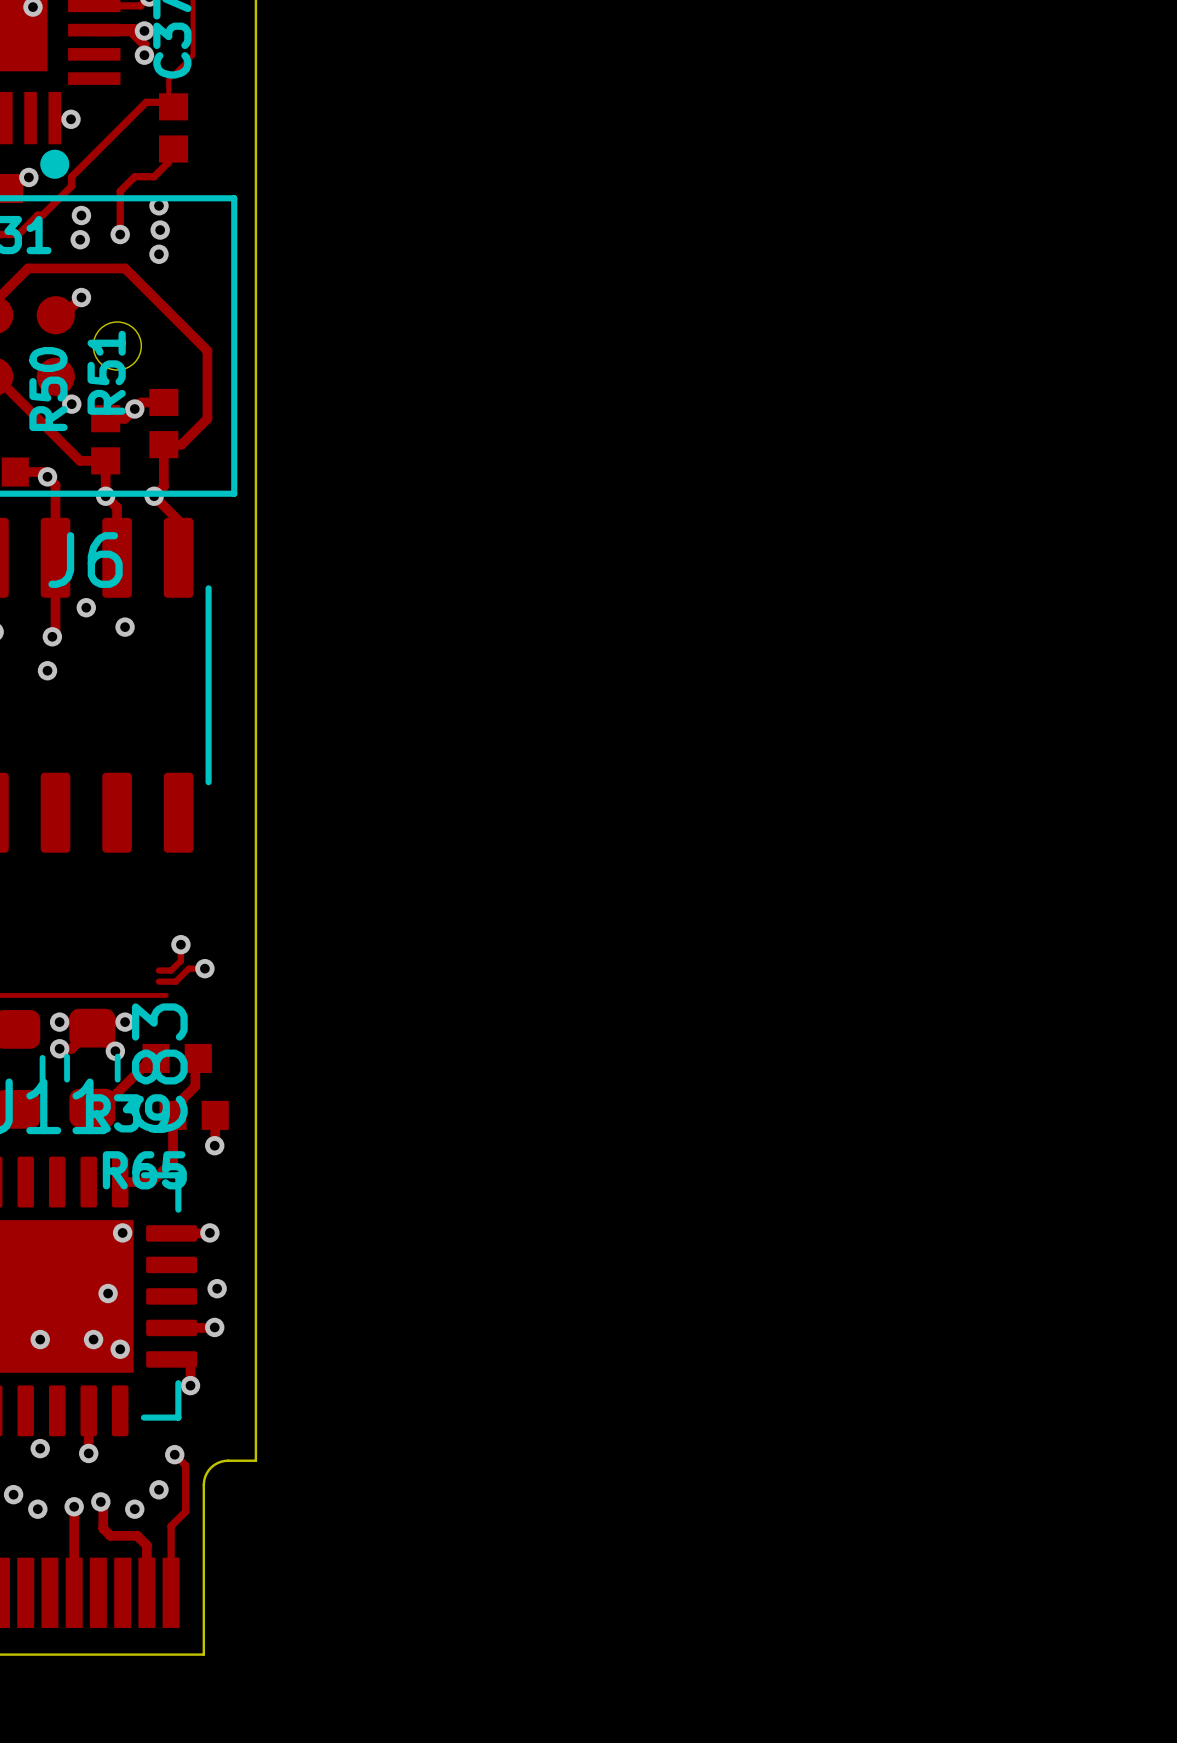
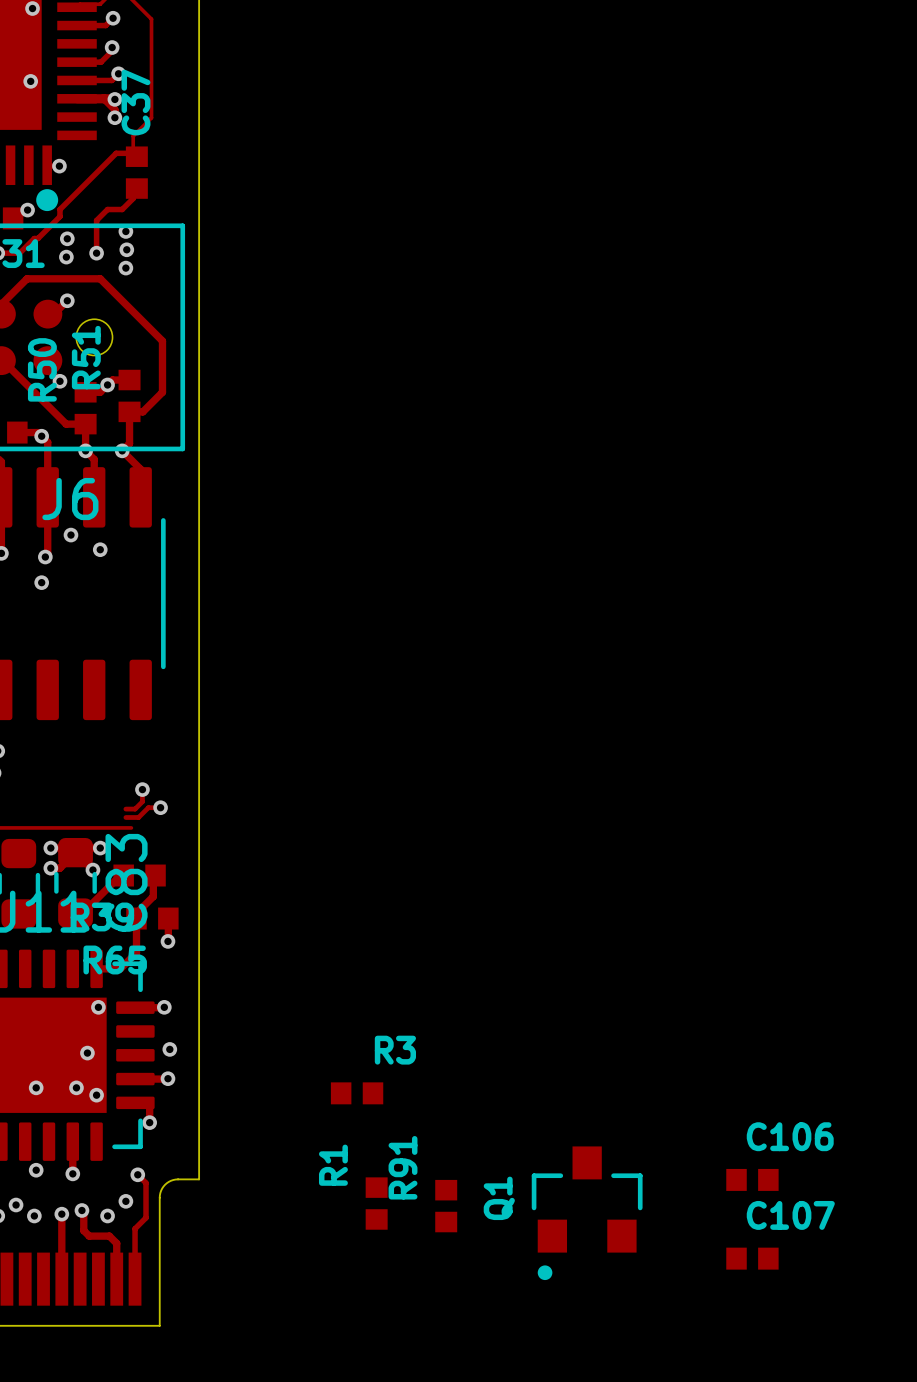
R3: none -> (357, 1093)
C106: none -> (752, 1179)
R1: none -> (376, 1203)
R91: none -> (446, 1206)
Q1: none -> (587, 1213)
C107: none -> (752, 1258)

